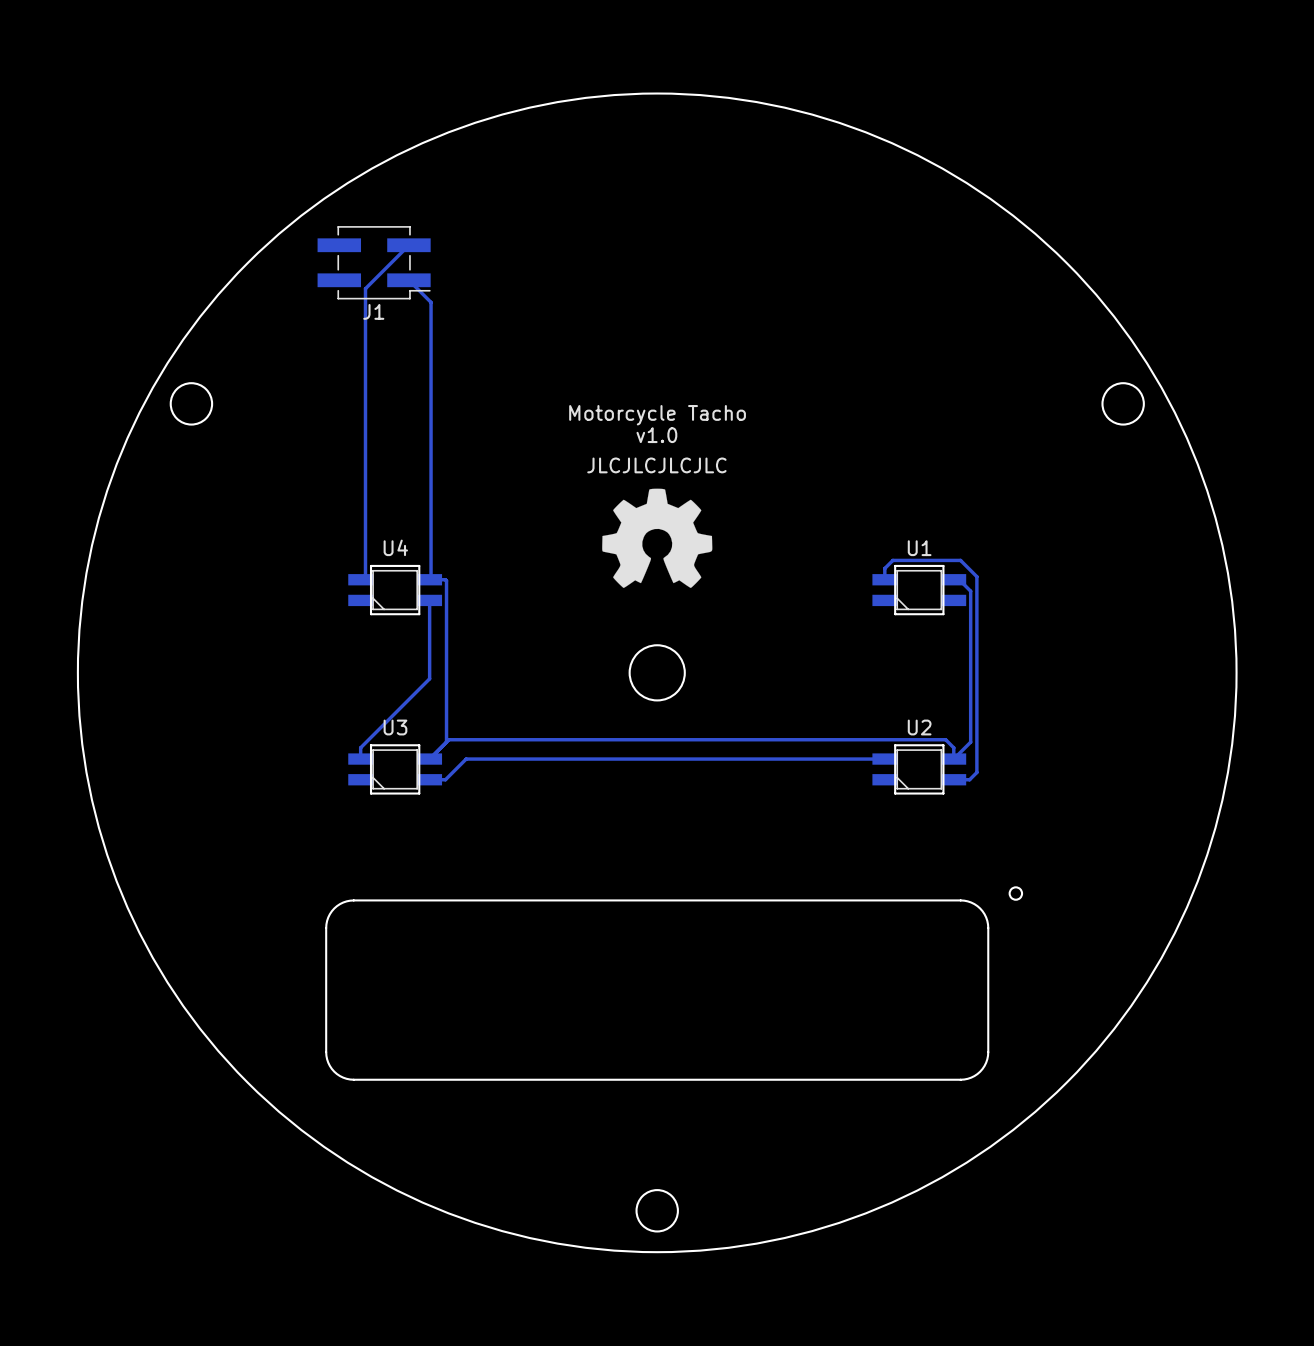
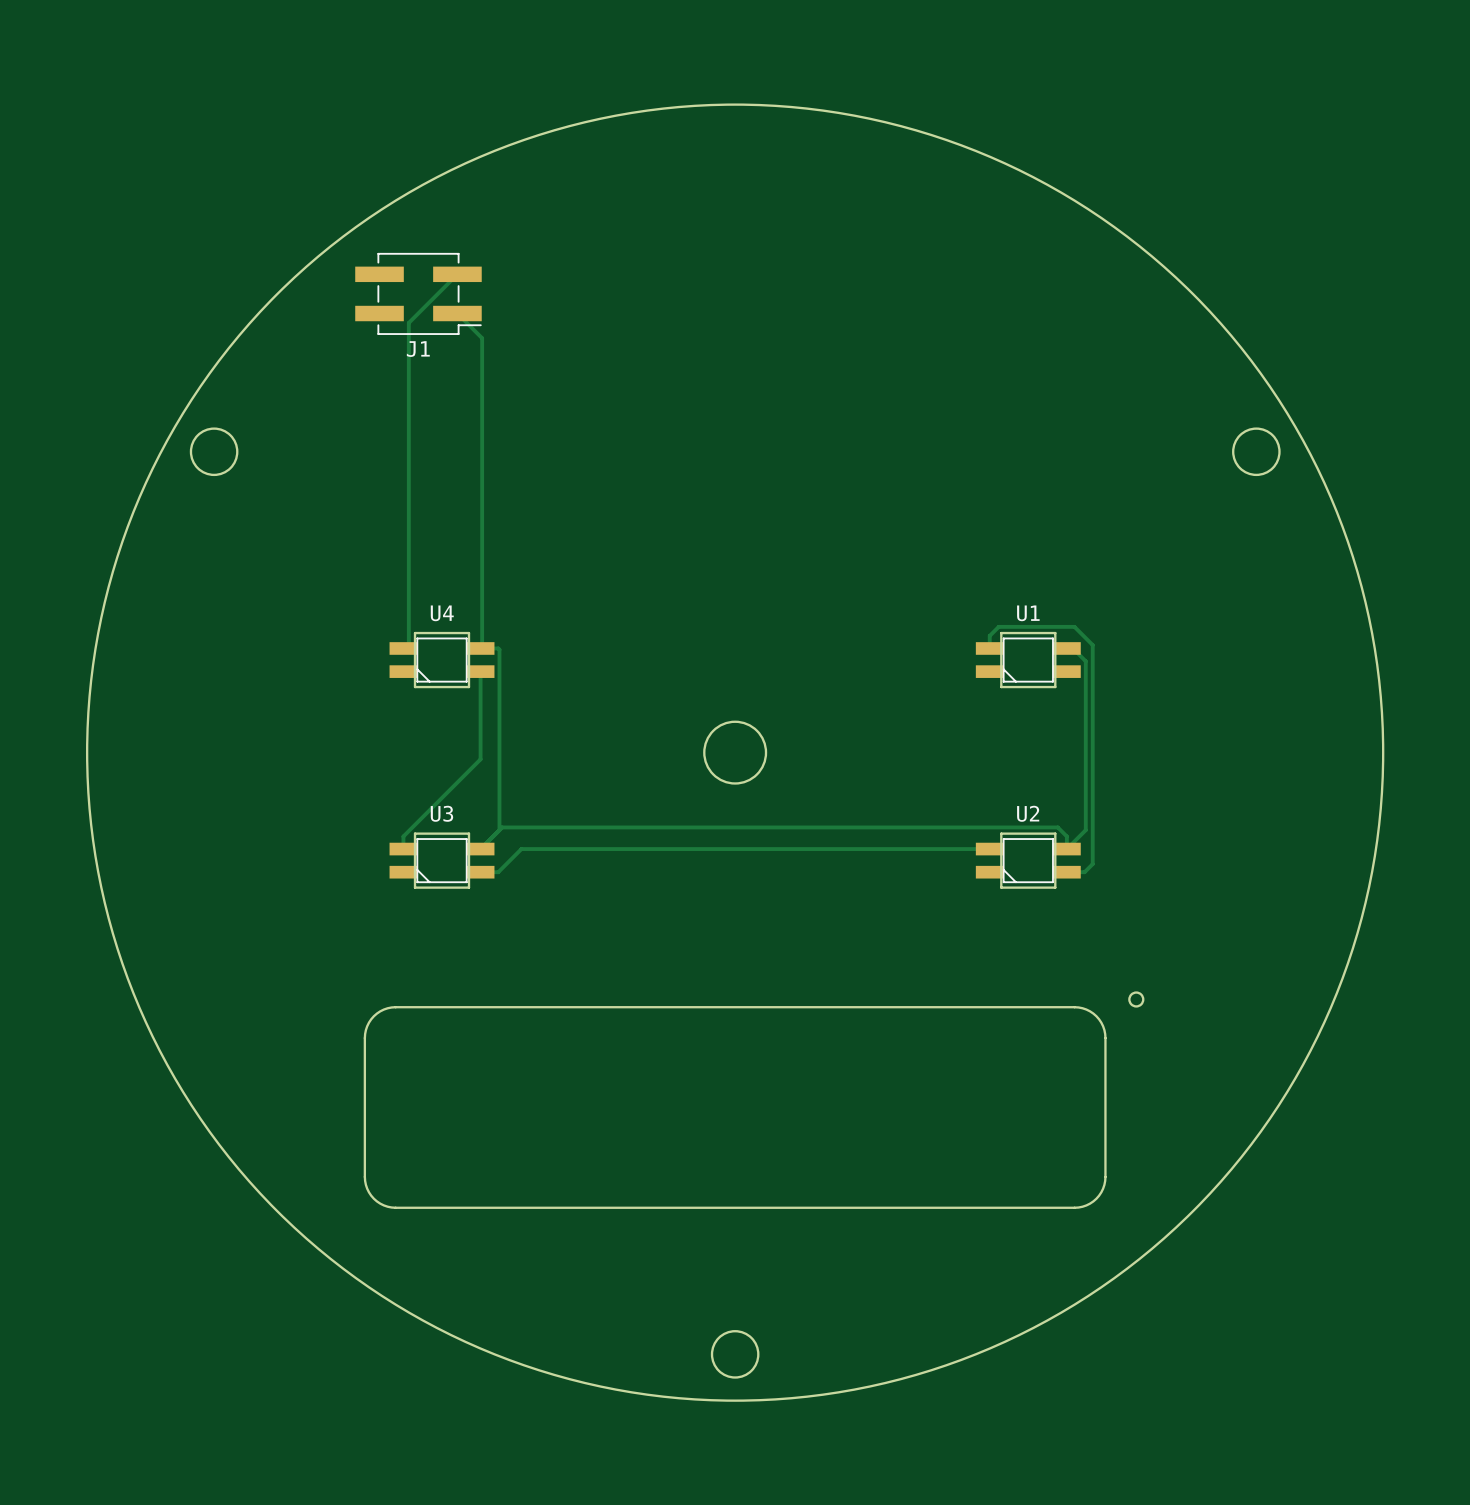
text: Motorcycle Tacho (657, 415) -> none
text: v1.0 (656, 435) -> none
text: JLCJLCJLCJLC (656, 465) -> none
drawing: [602, 488, 713, 588] -> none

